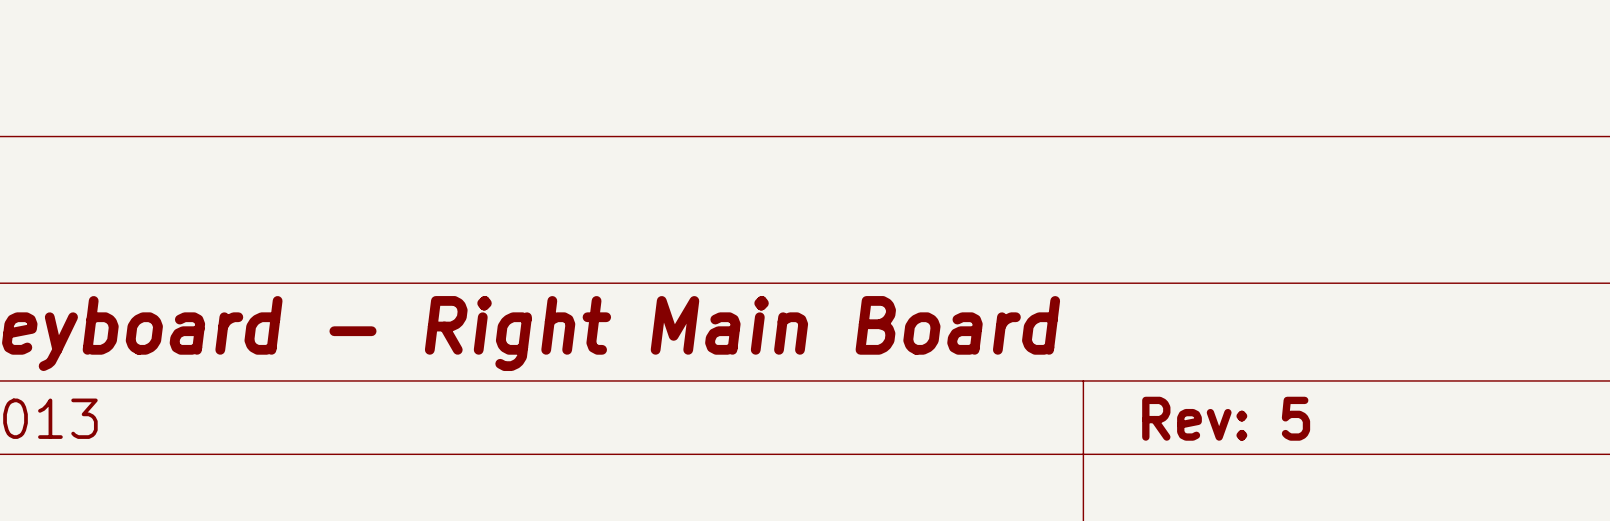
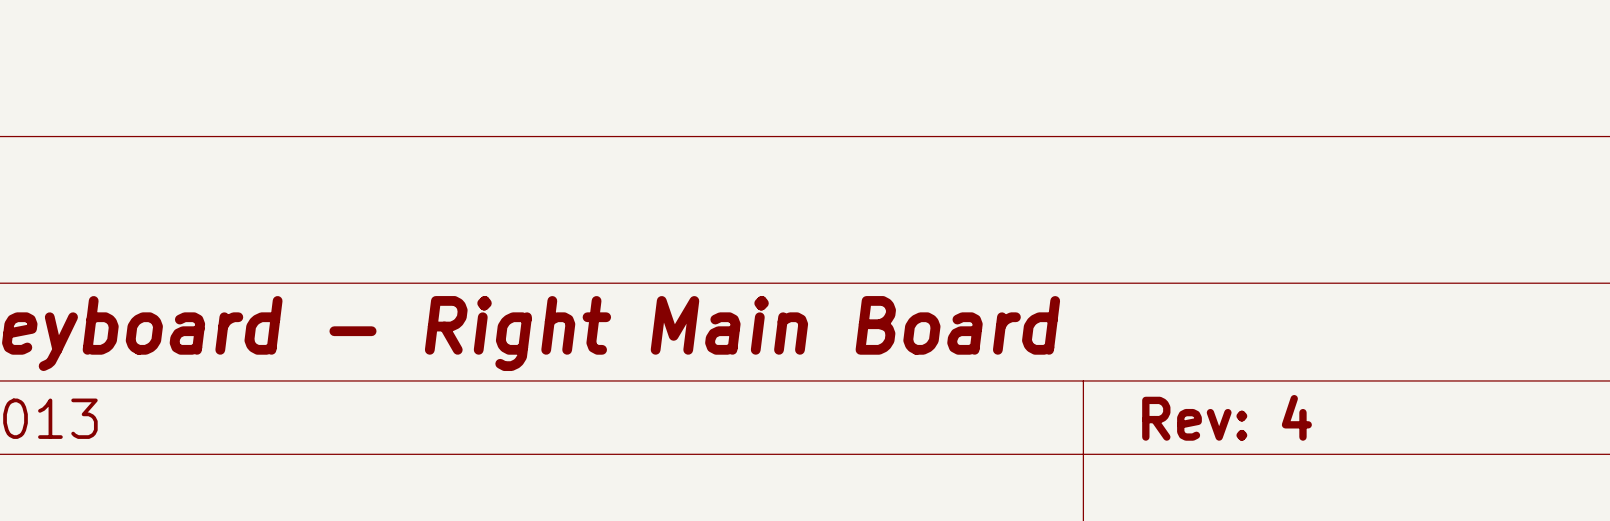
title block: Rev: 5 (1226, 418) -> Rev: 4 (1227, 417)

